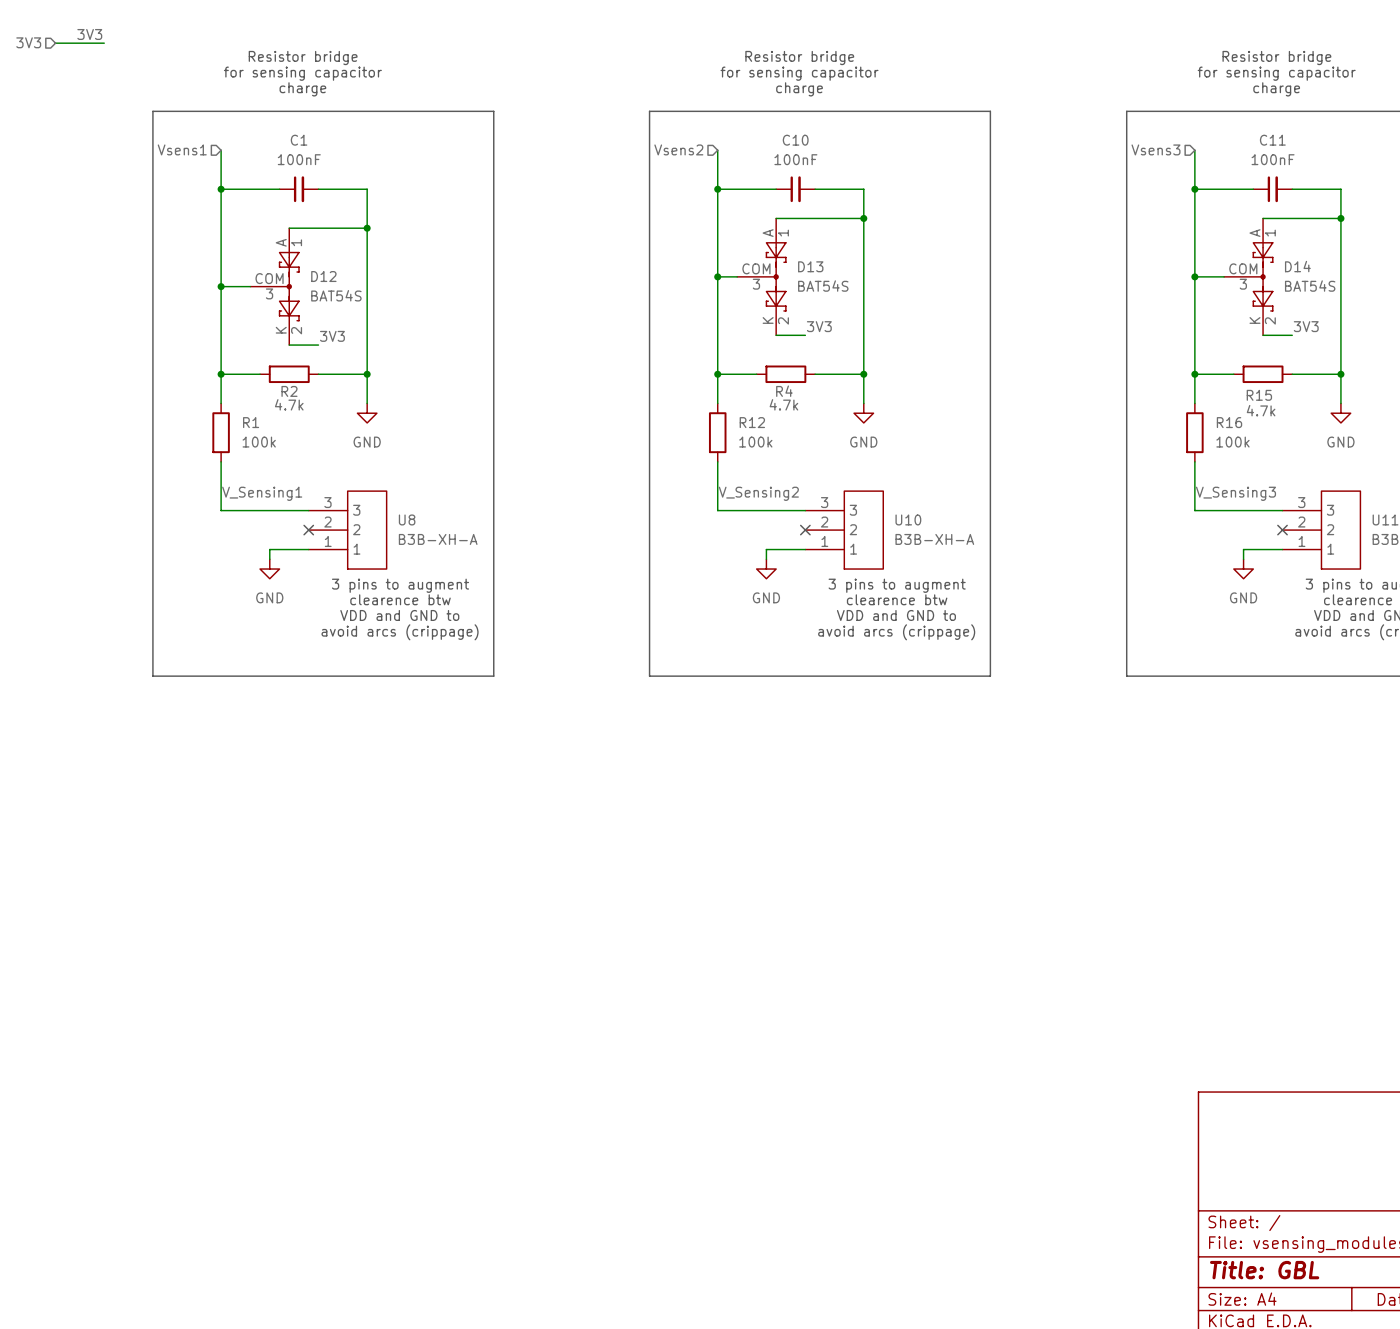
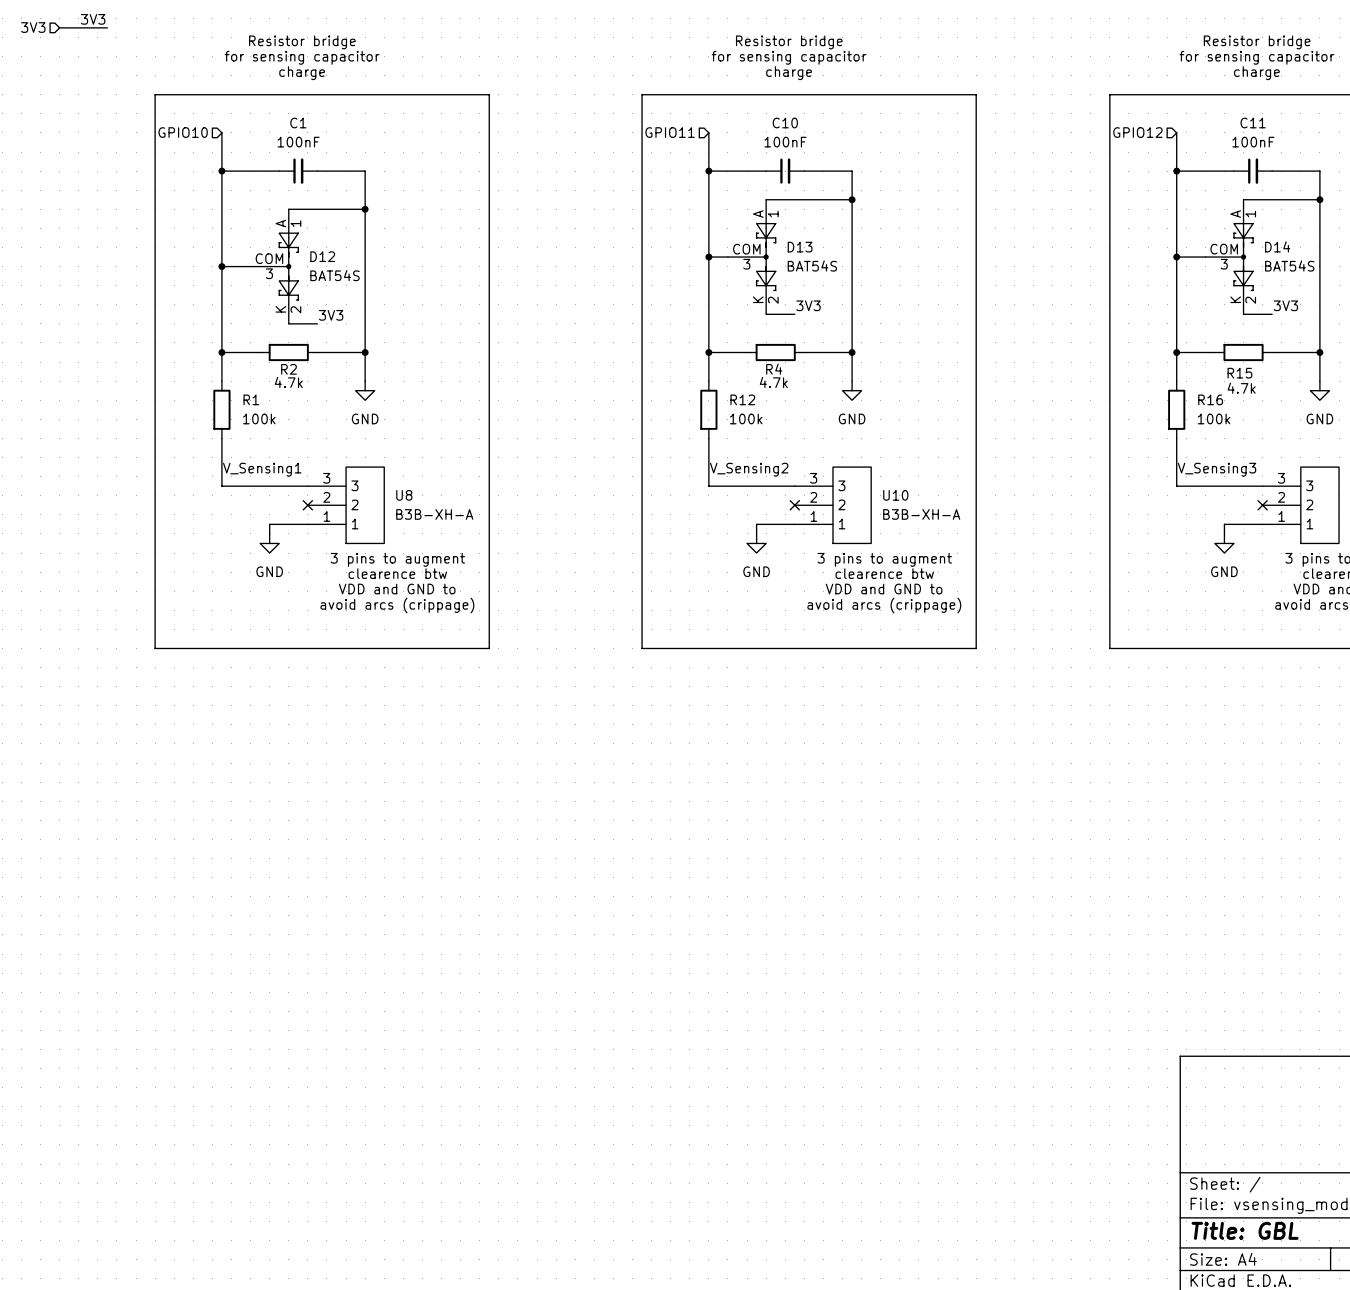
hierarchical label: Vsens1 (182, 149) -> GPIO10 (183, 132)
hierarchical label: Vsens2 (678, 149) -> GPIO11 (670, 132)
hierarchical label: Vsens3 (1156, 149) -> GPIO12 (1137, 132)

